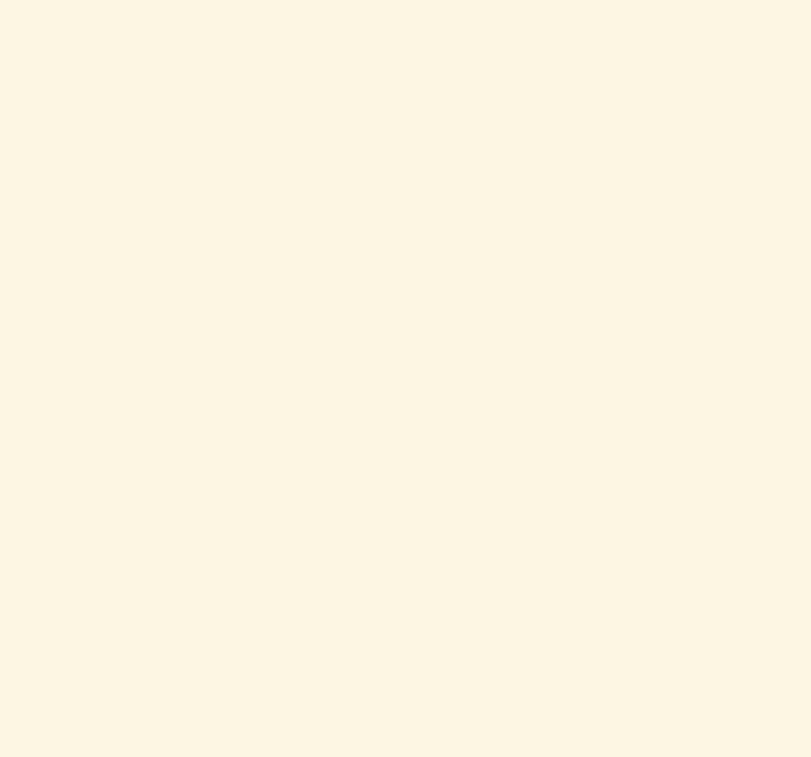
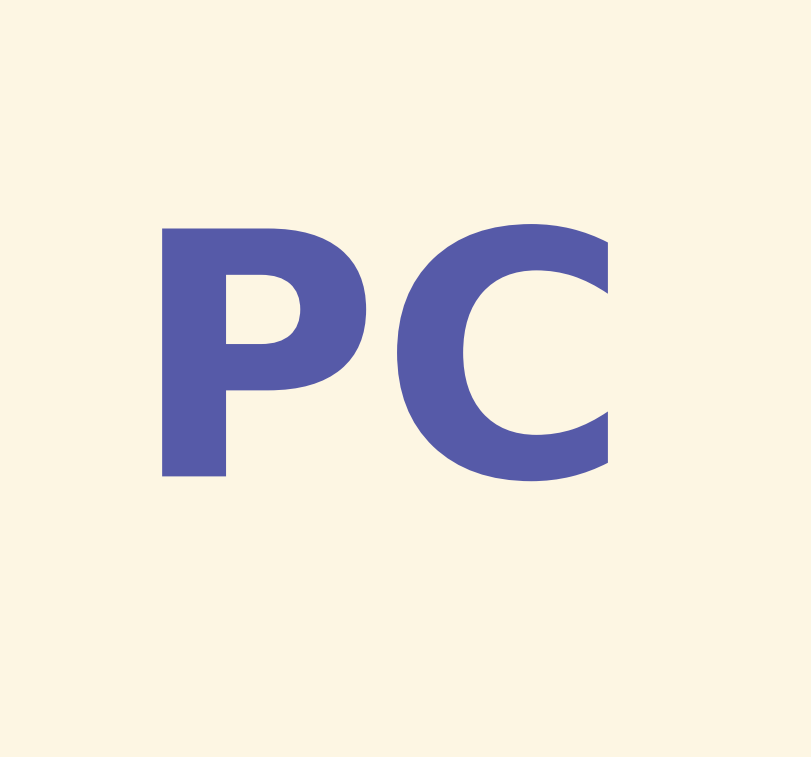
text: none -> PC (385, 352)

